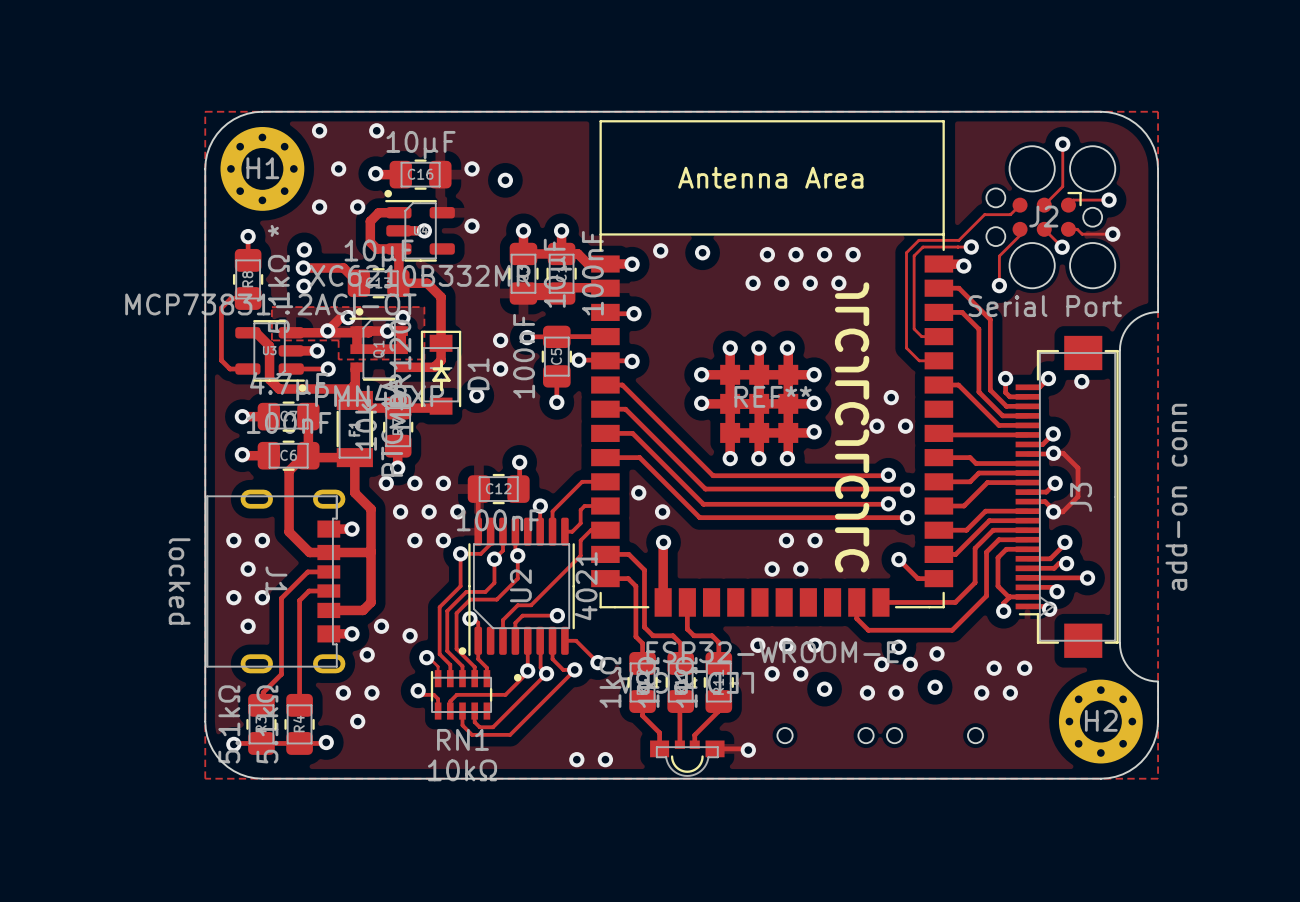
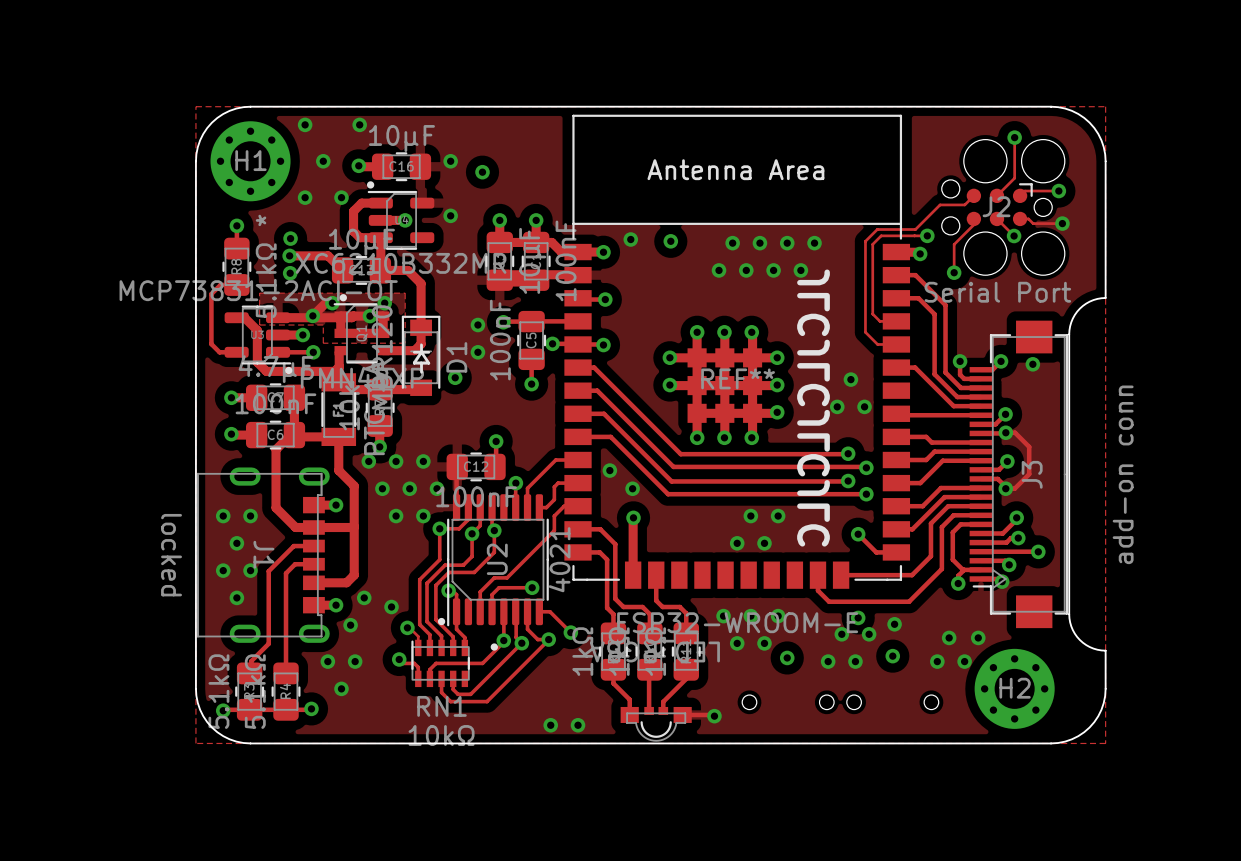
H2 position: (1100, 721) -> (1014, 688)

